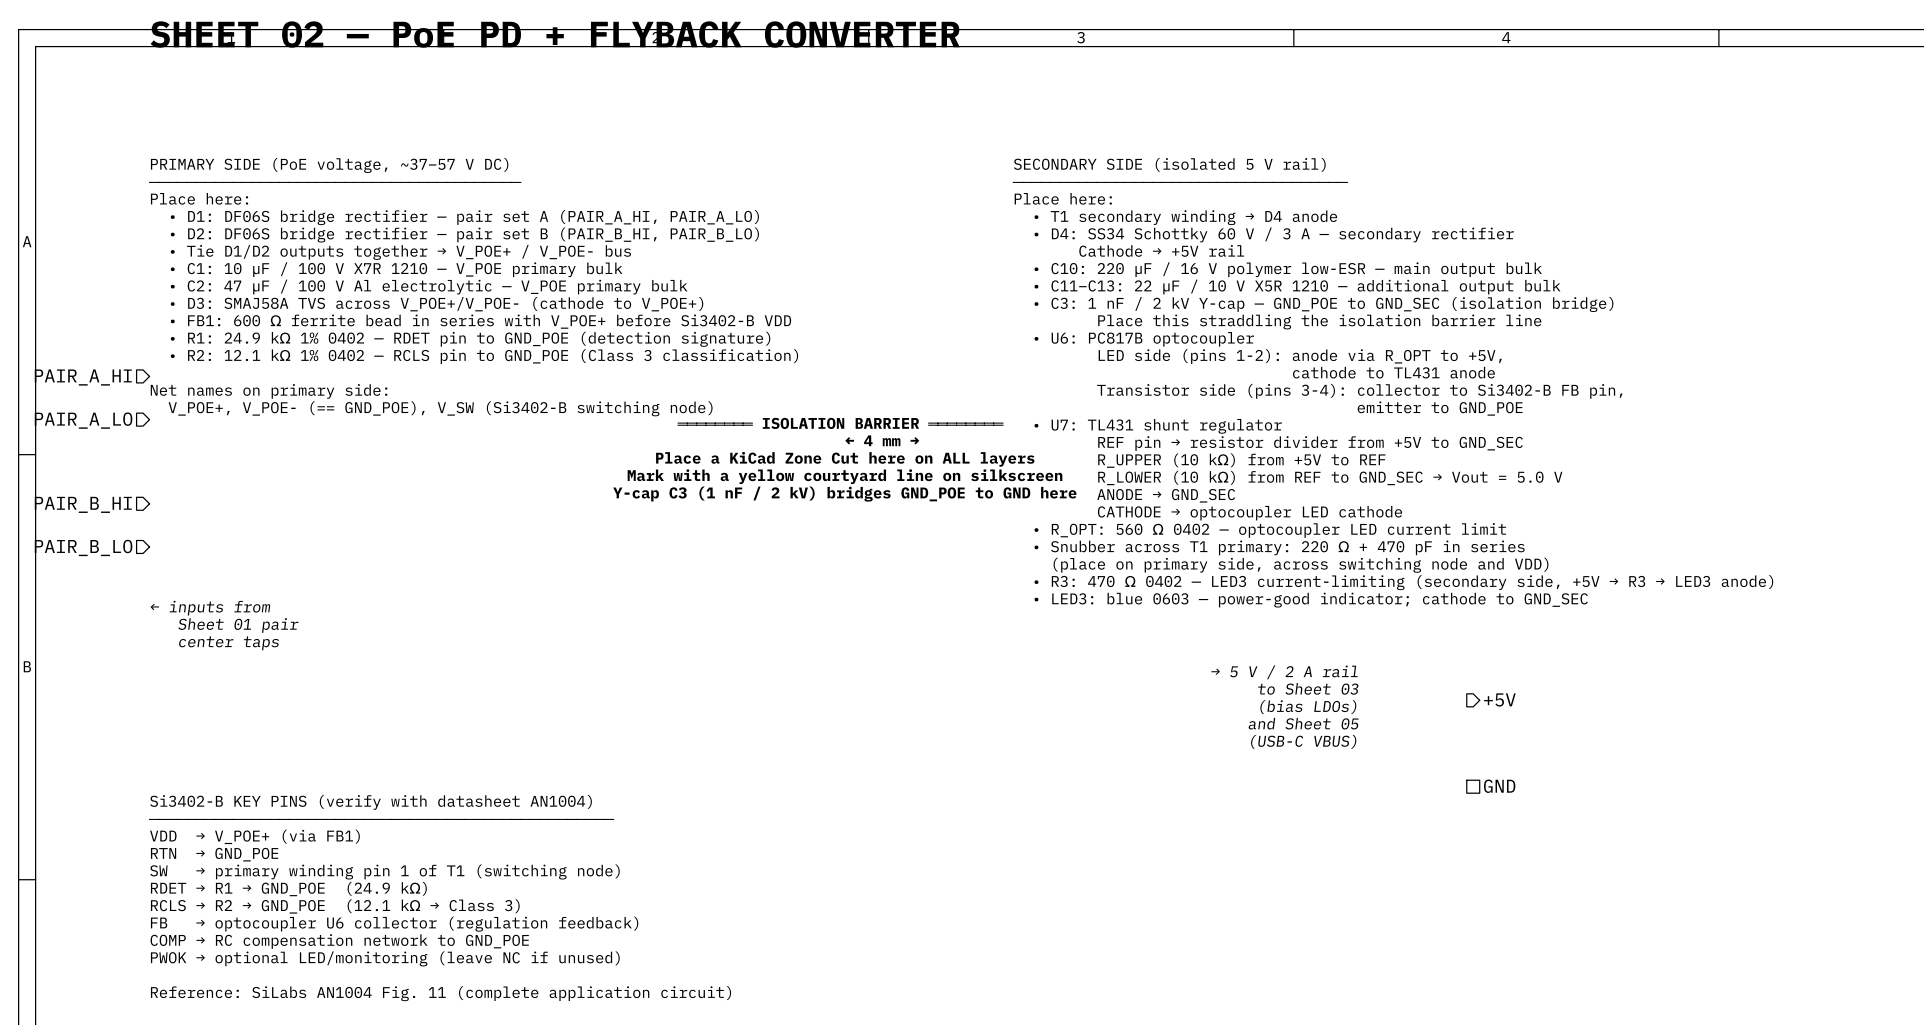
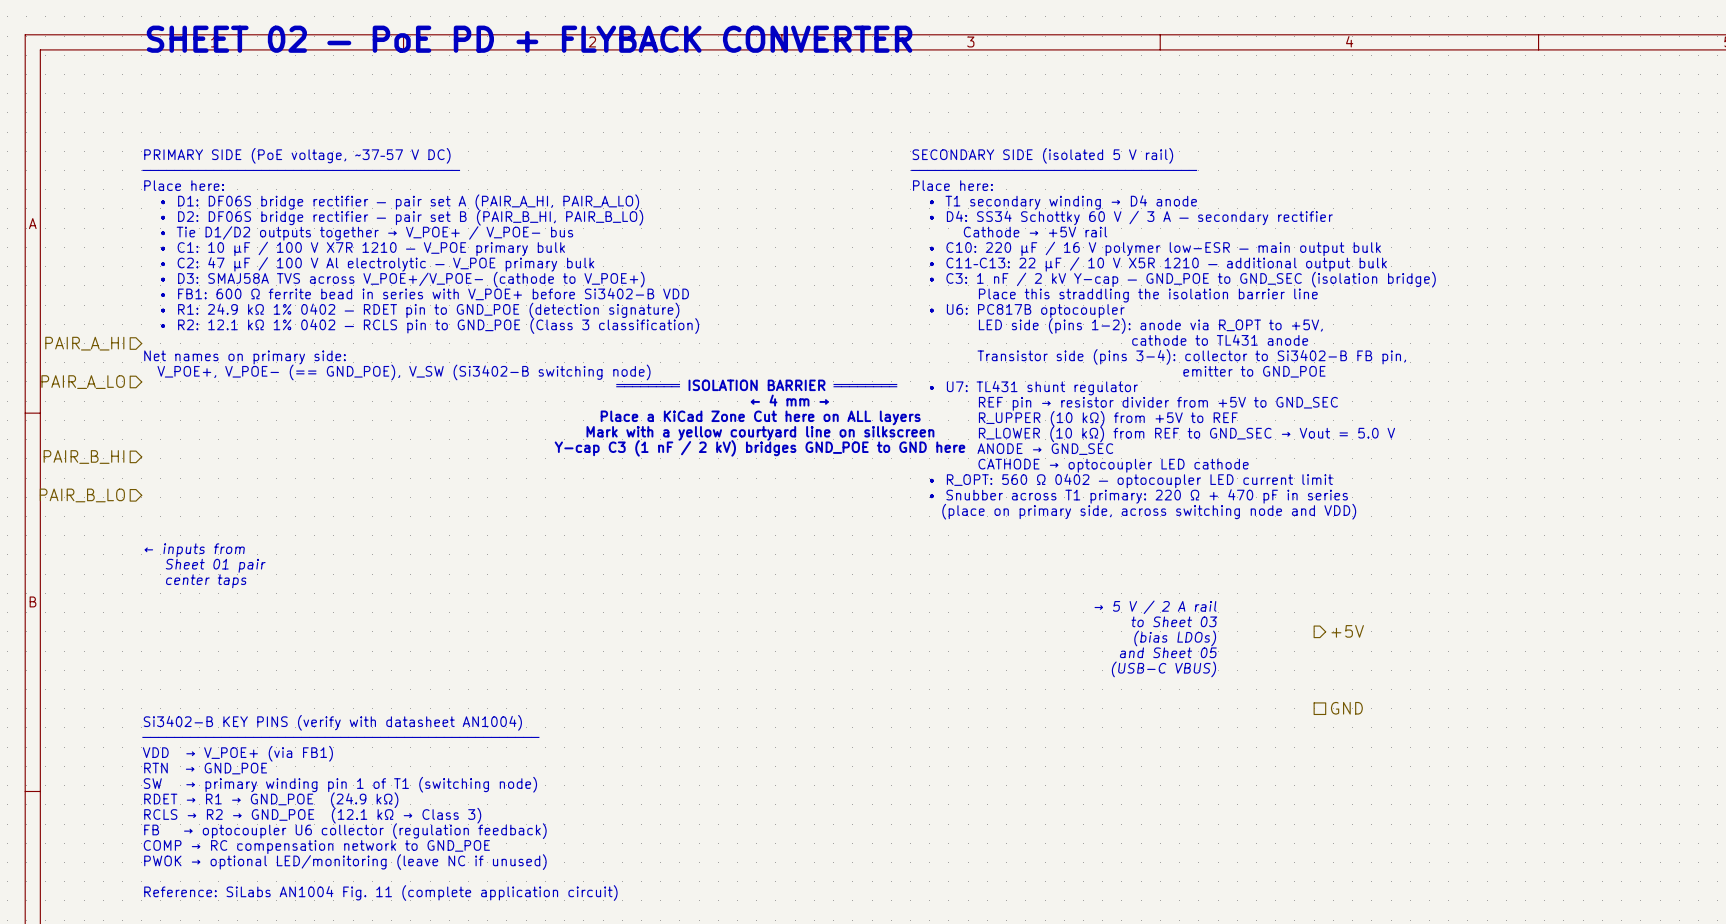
text: • R3: 470 Ω 0402 — LED3 current-limiting (secondary side, +5V → R3 → LED3 anode) (1403, 582) -> none
text: • LED3: blue 0603 — power-good indicator; cathode to GND_SEC (1311, 600) -> none

